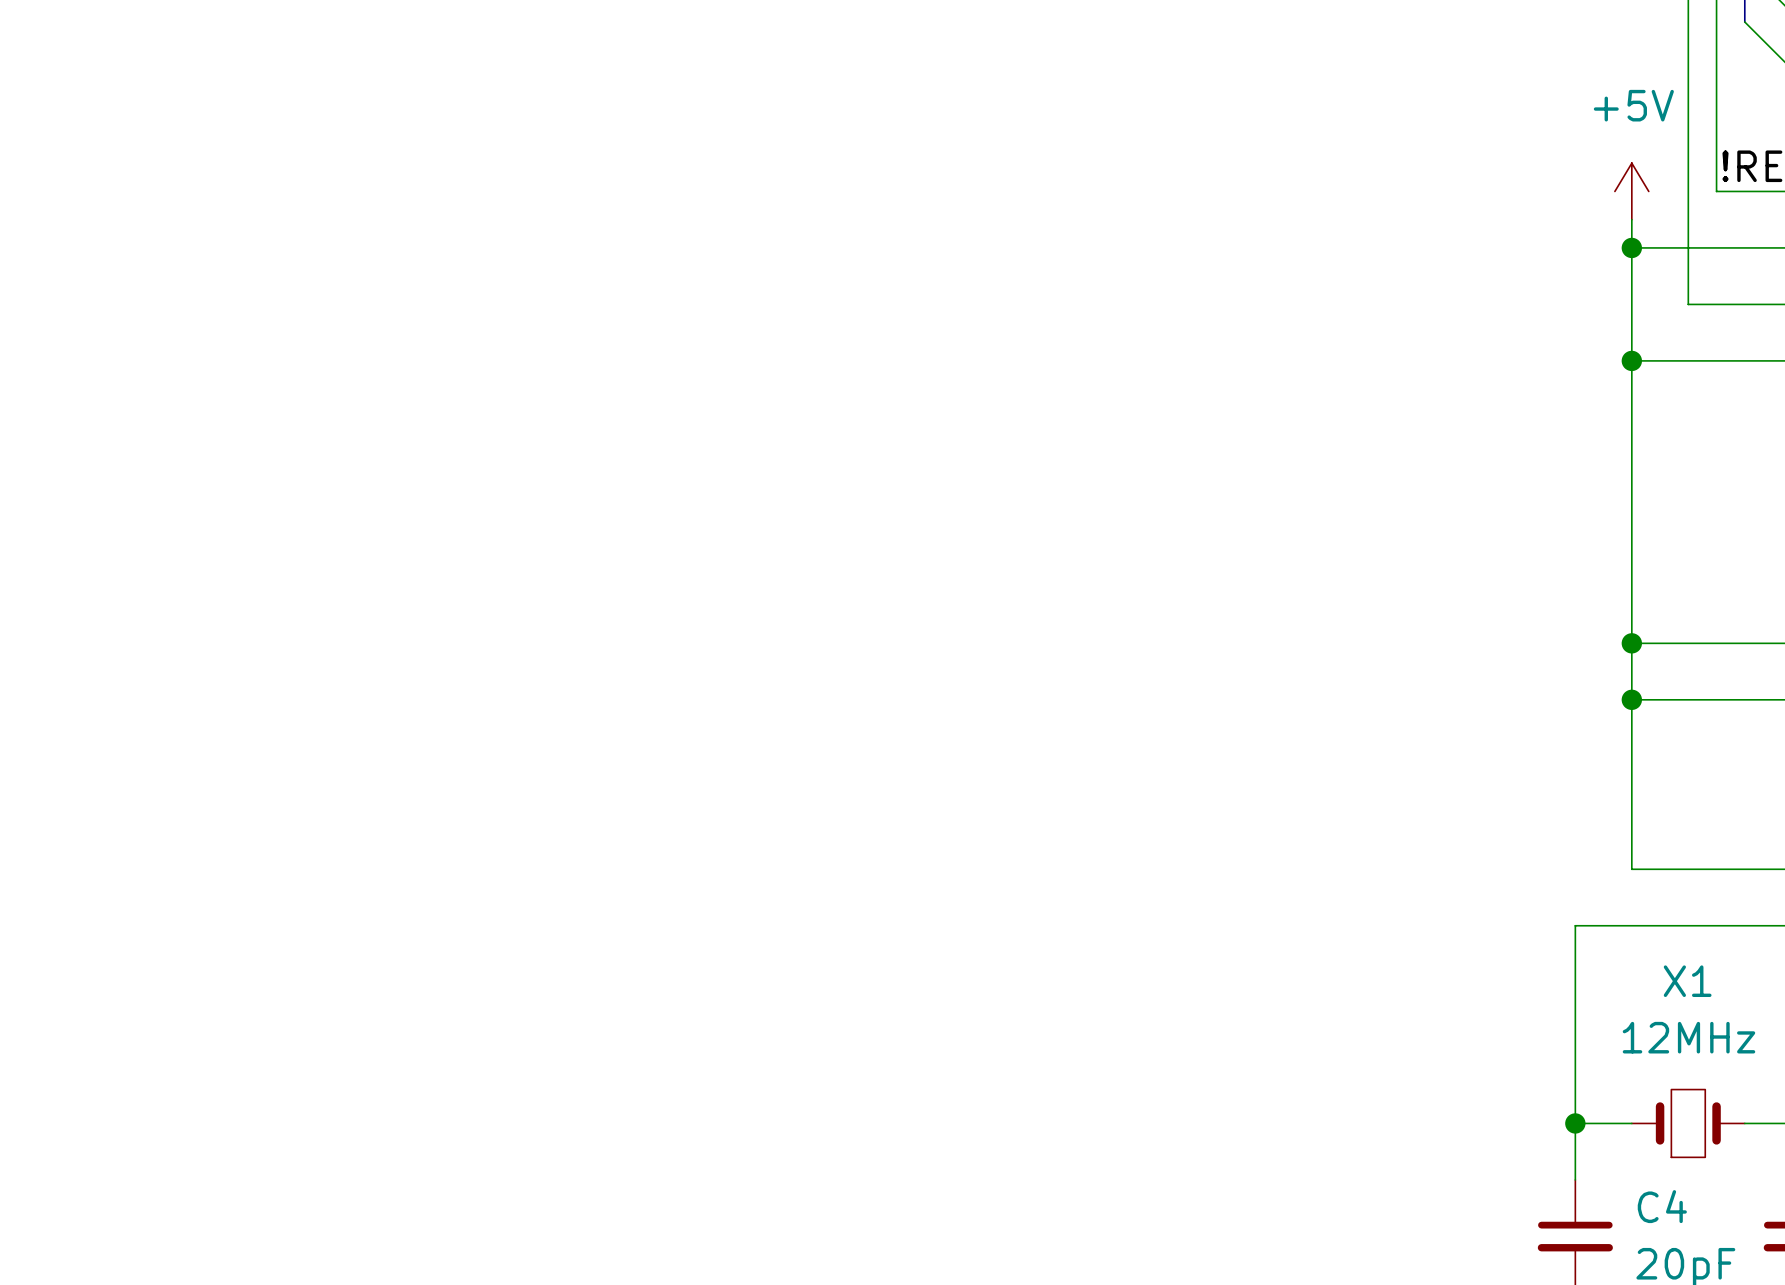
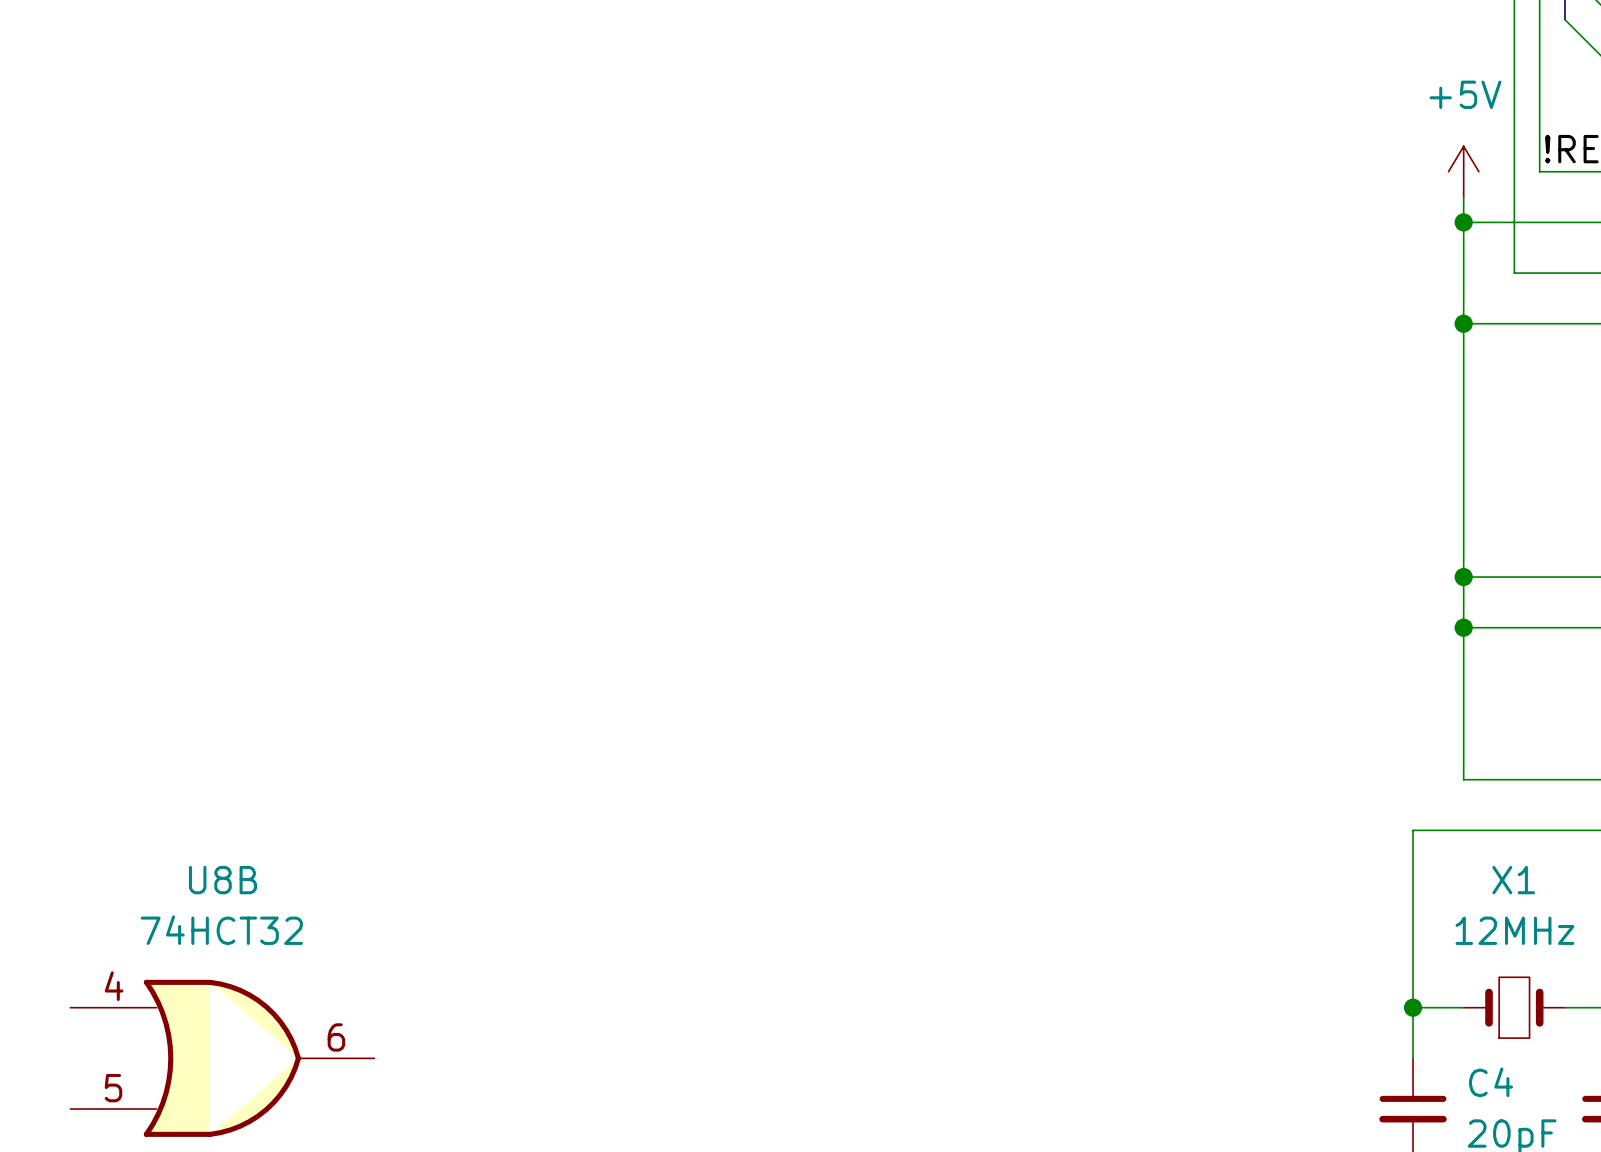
U8B: none -> 74HCT32 (222, 1058)

